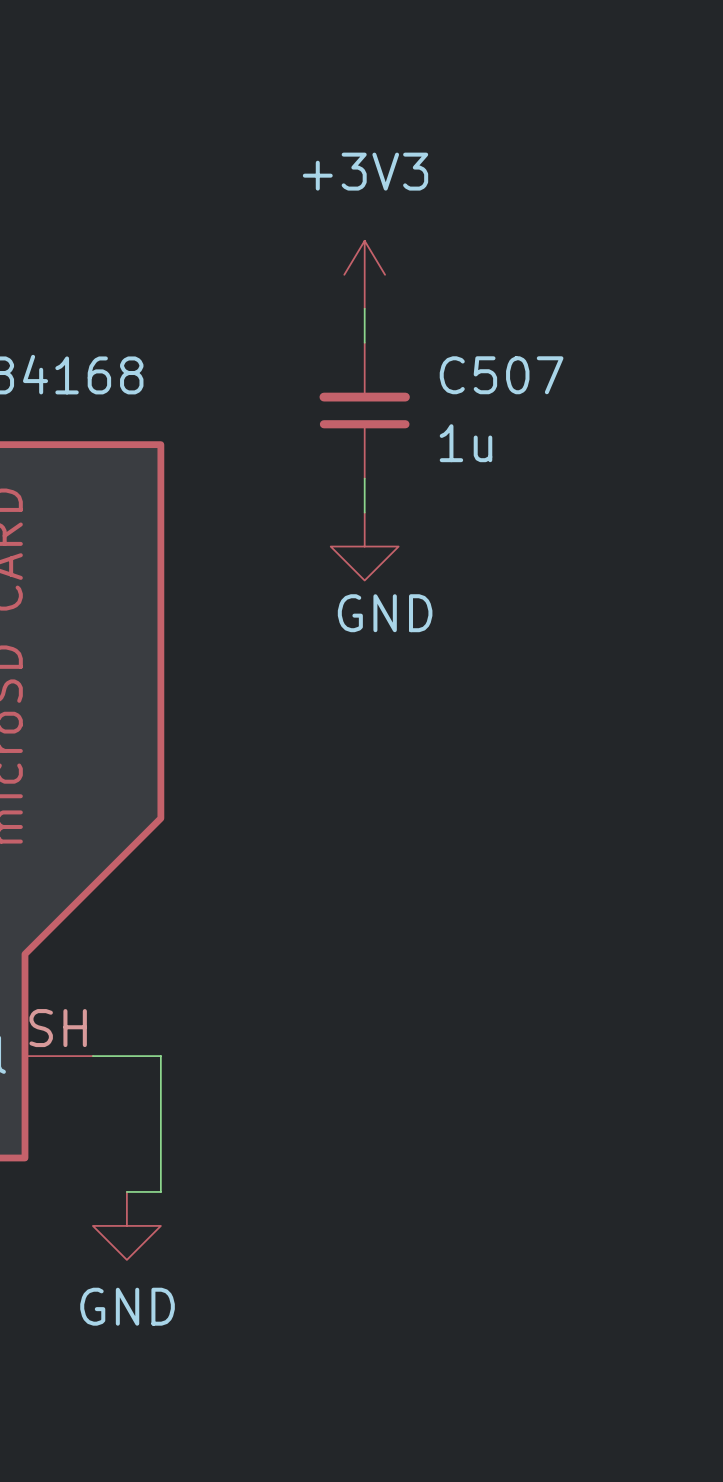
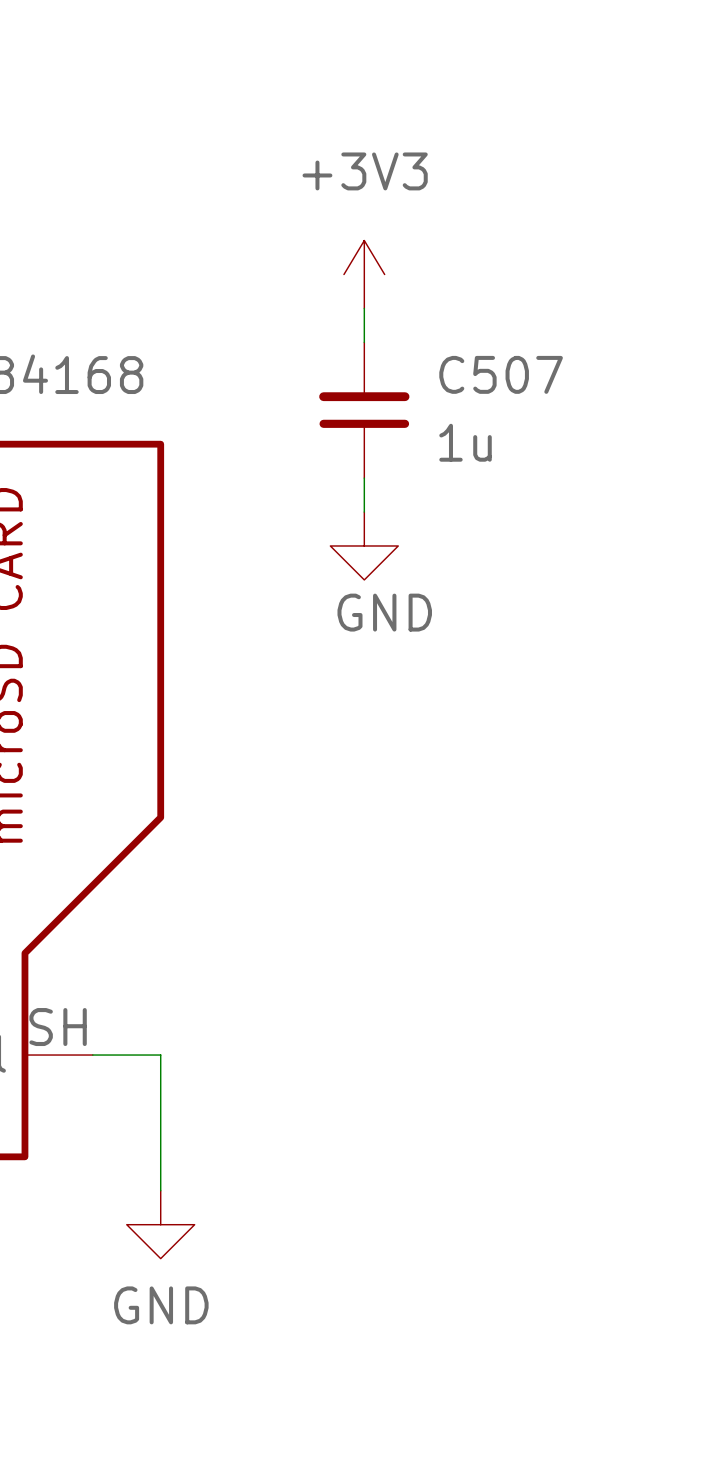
wire: (126, 1191) (160, 1191) -> none
power symbol position: GND (126, 1225) -> GND (160, 1224)

